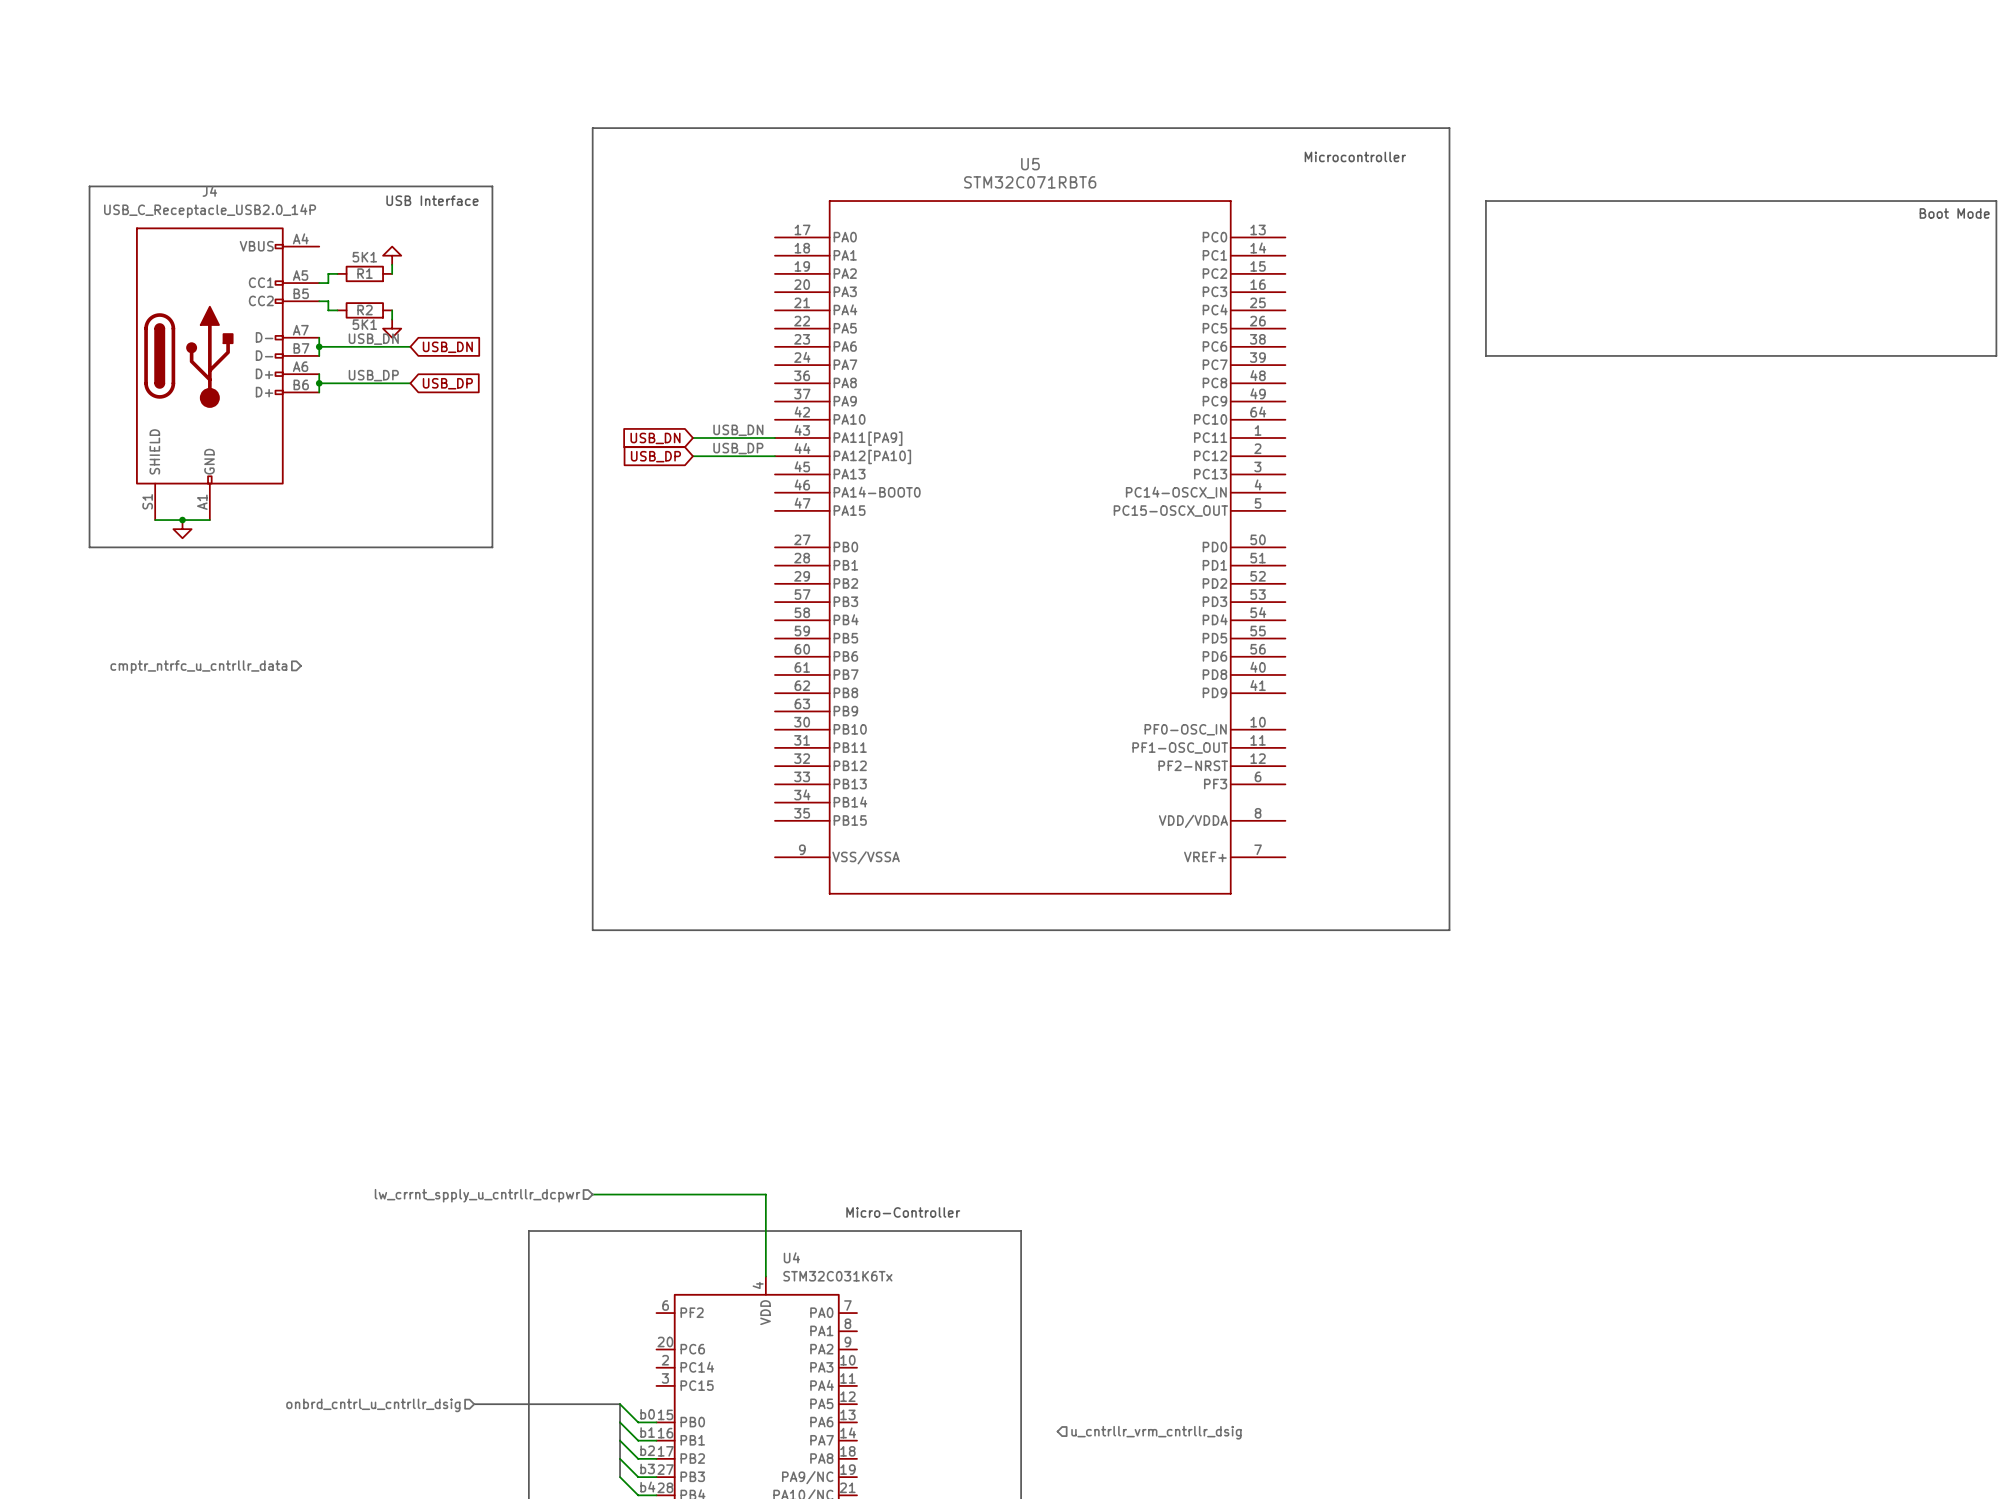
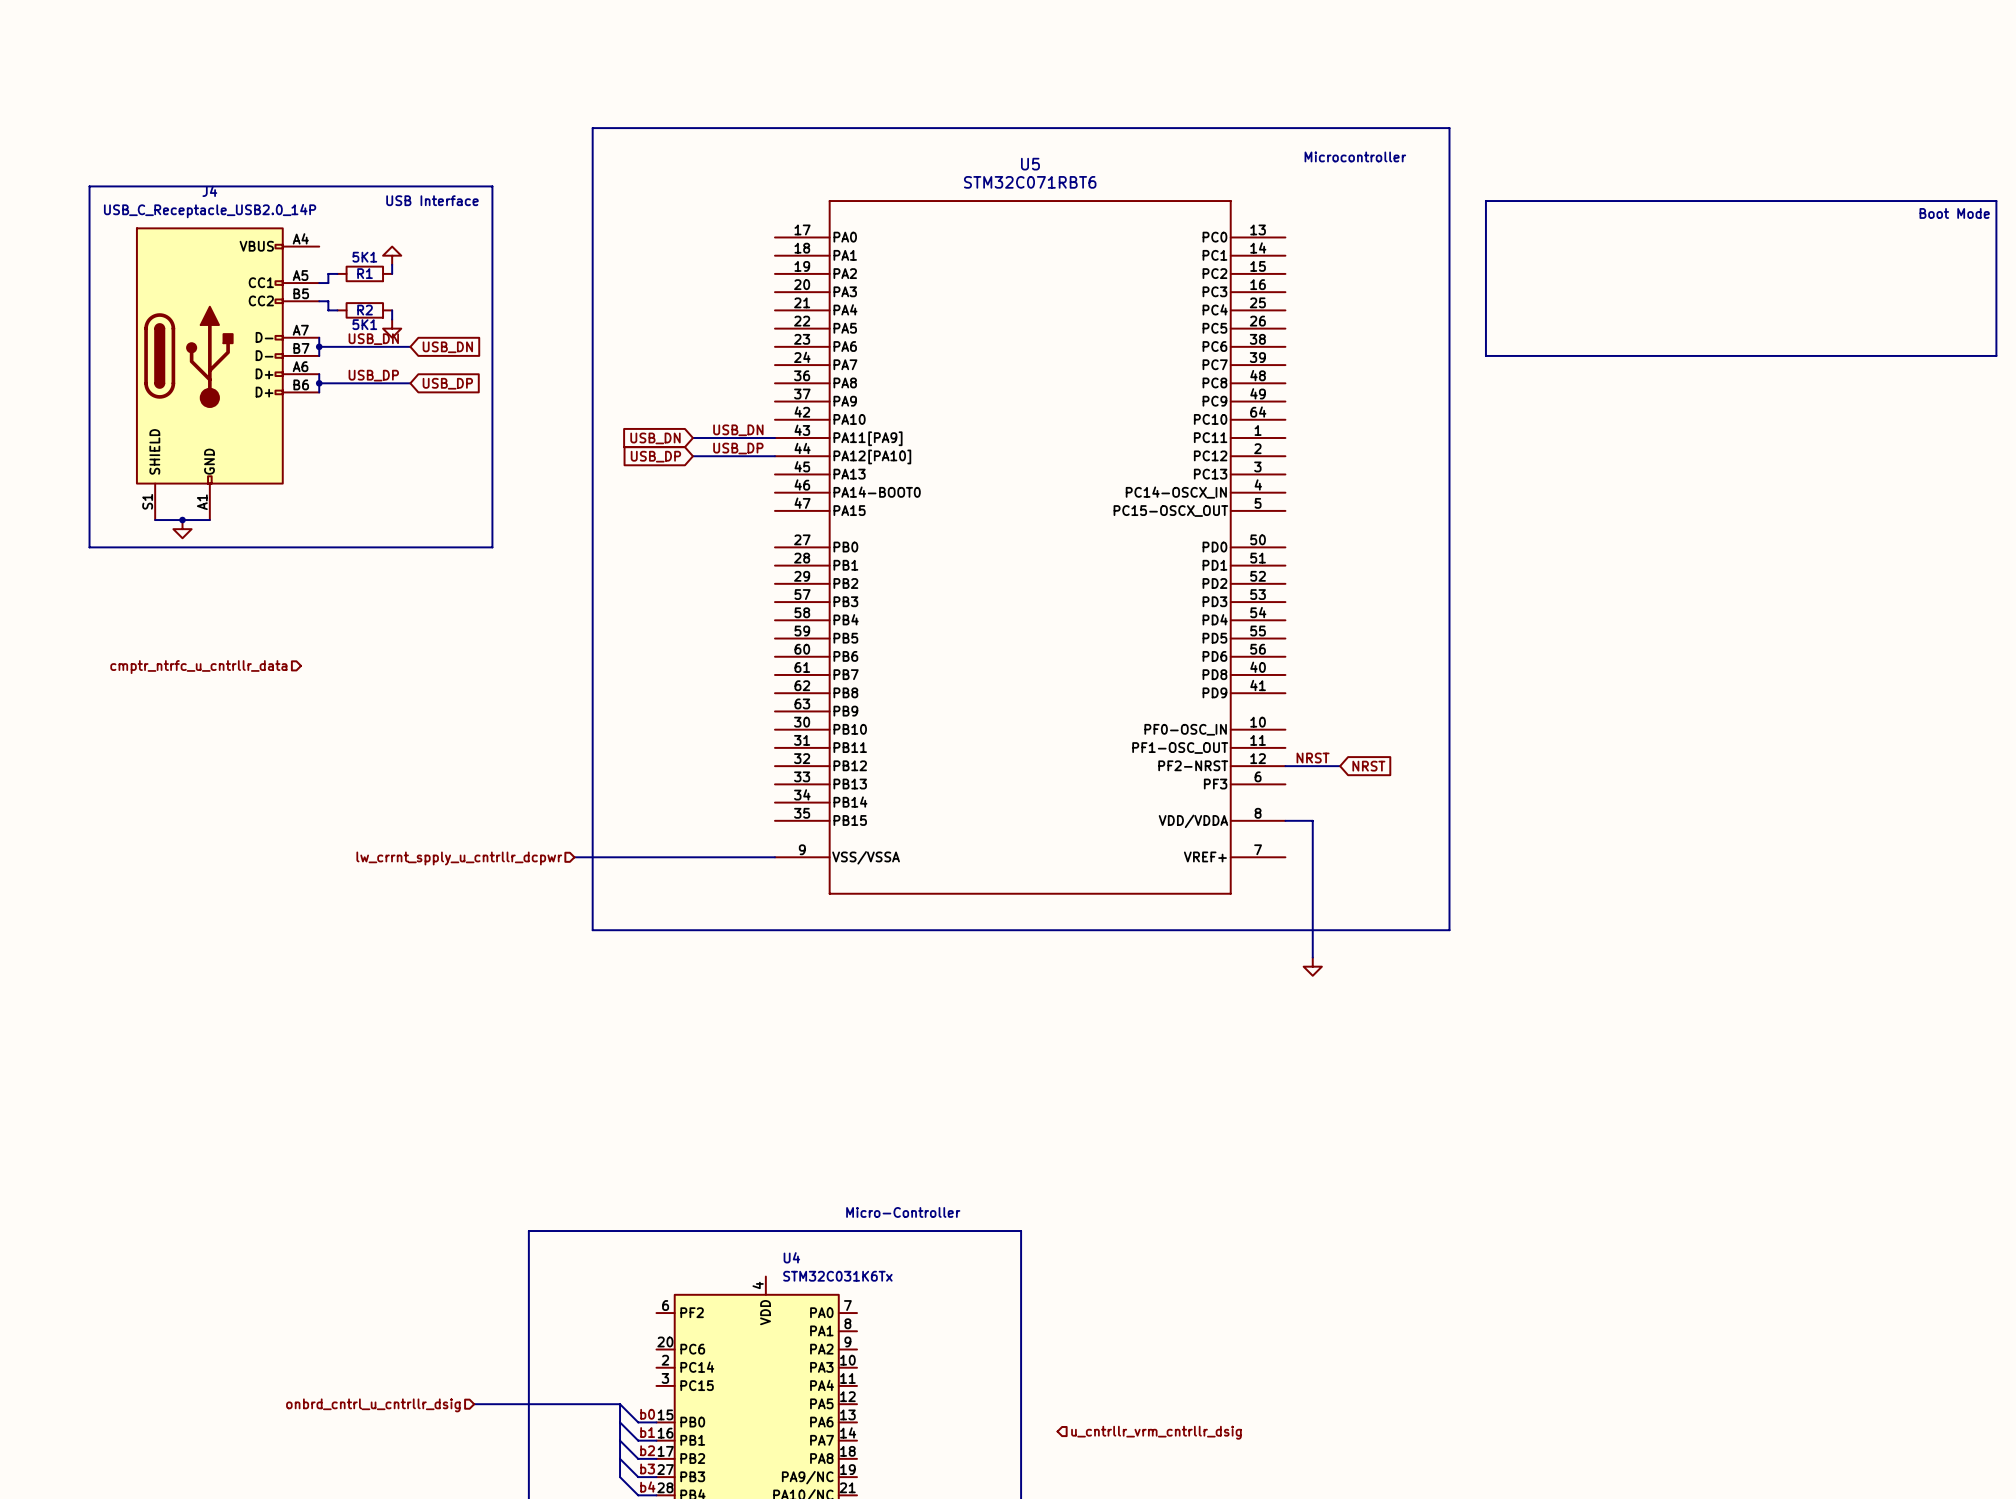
label: none -> NRST (1313, 758)
wire: none -> (1285, 766) (1340, 766)
global label: none -> NRST (1368, 766)
wire: none -> (1285, 820) (1312, 820) (1312, 957)
wire: none -> (574, 857) (774, 857)
hierarchical label: none -> lw_crrnt_spply_u_cntrllr_dcpwr (459, 858)
power symbol: none -> (1312, 966)
wire: (592, 1194) (765, 1194) (765, 1276) -> none
hierarchical label: lw_crrnt_spply_u_cntrllr_dcpwr (477, 1195) -> none

